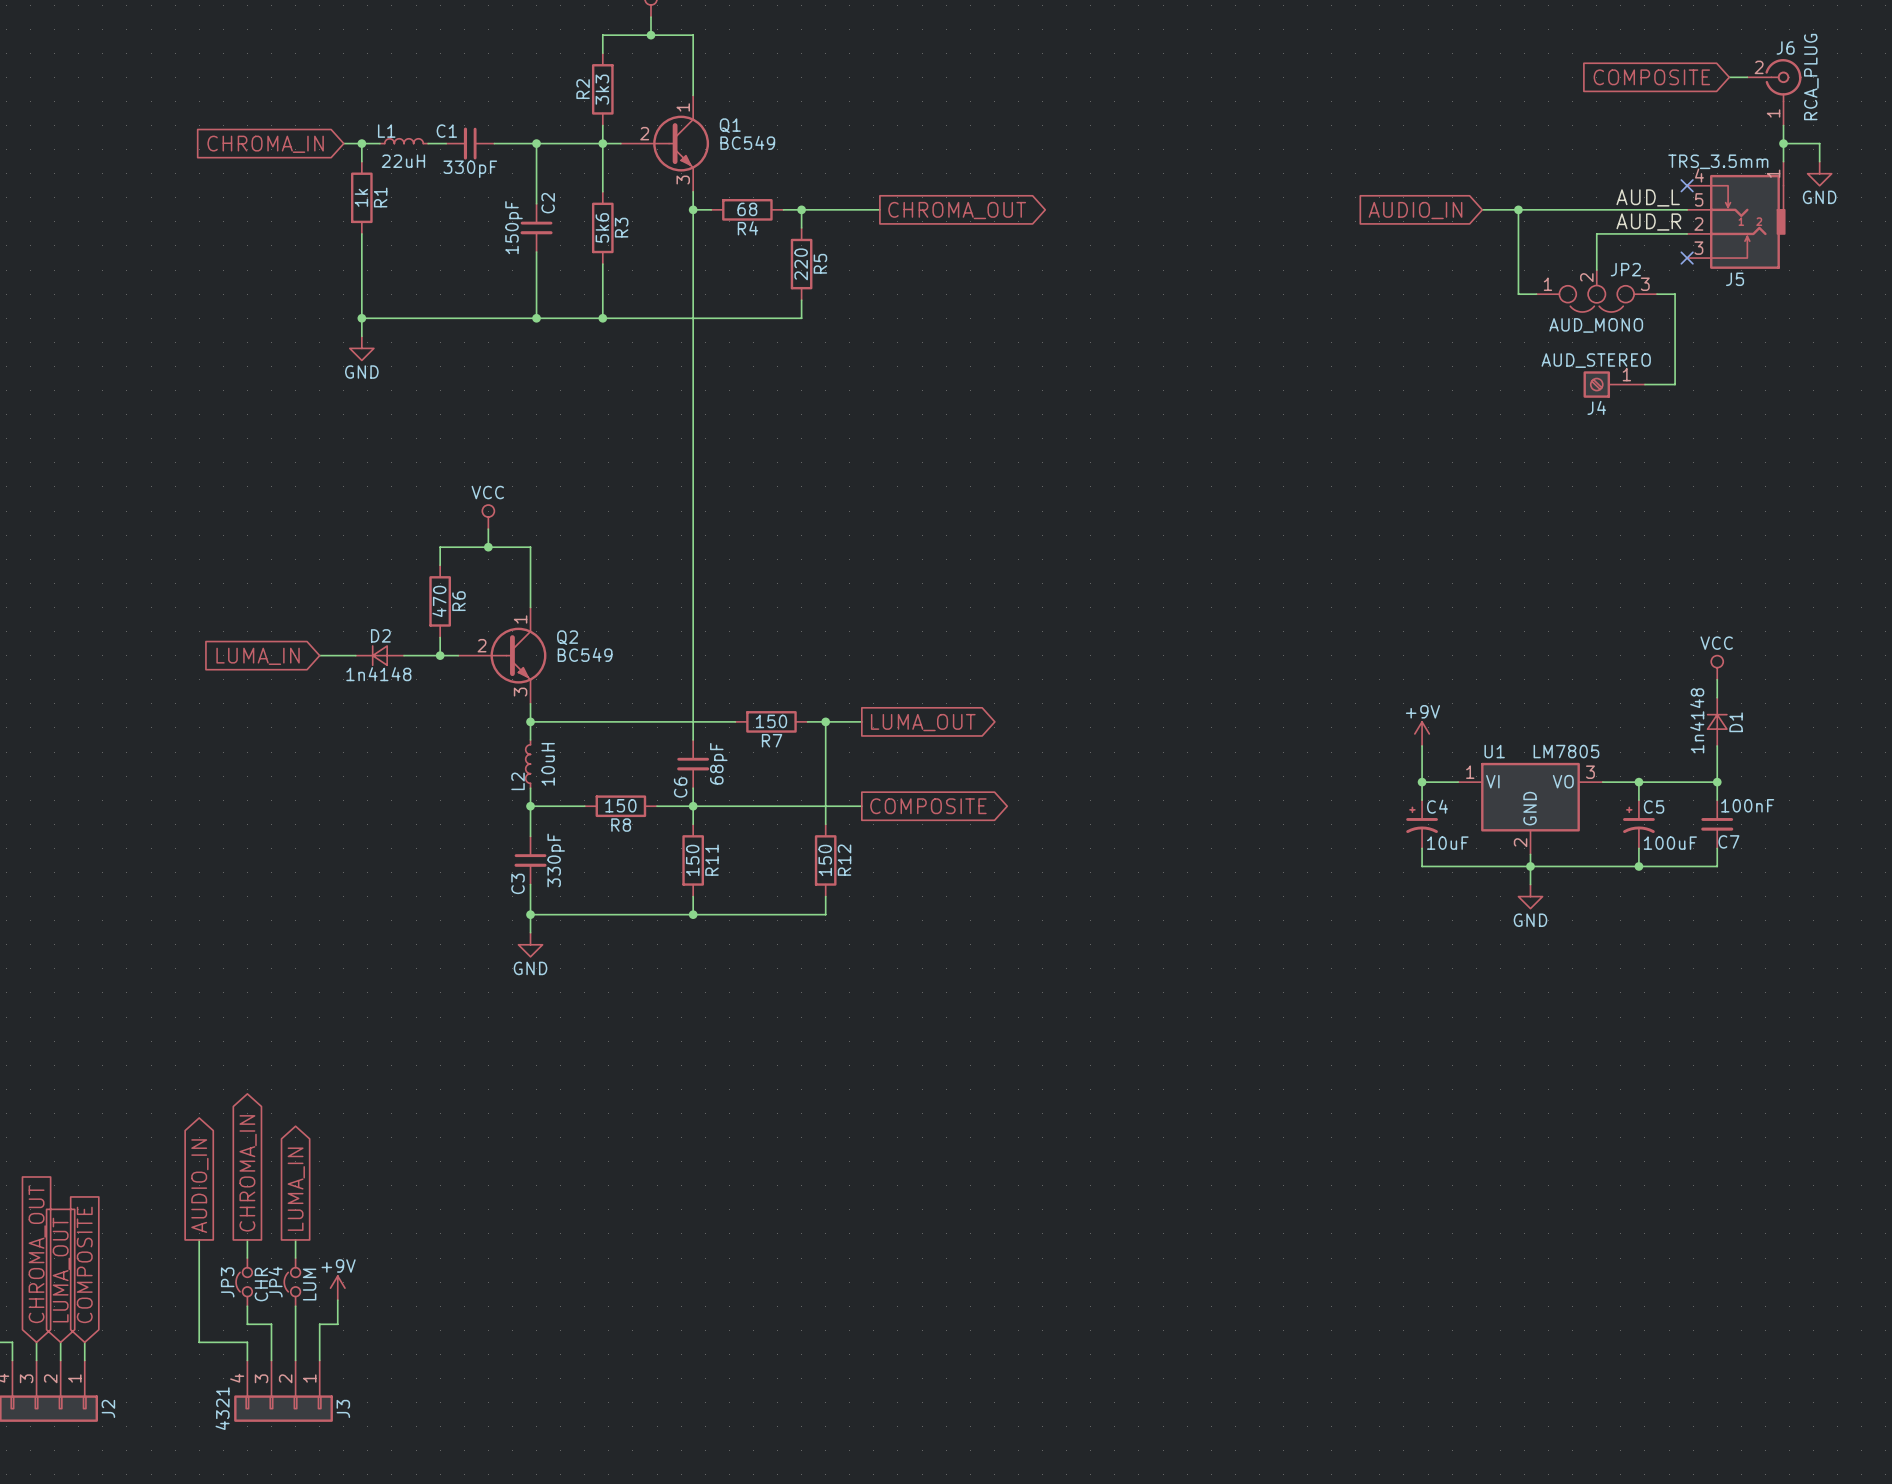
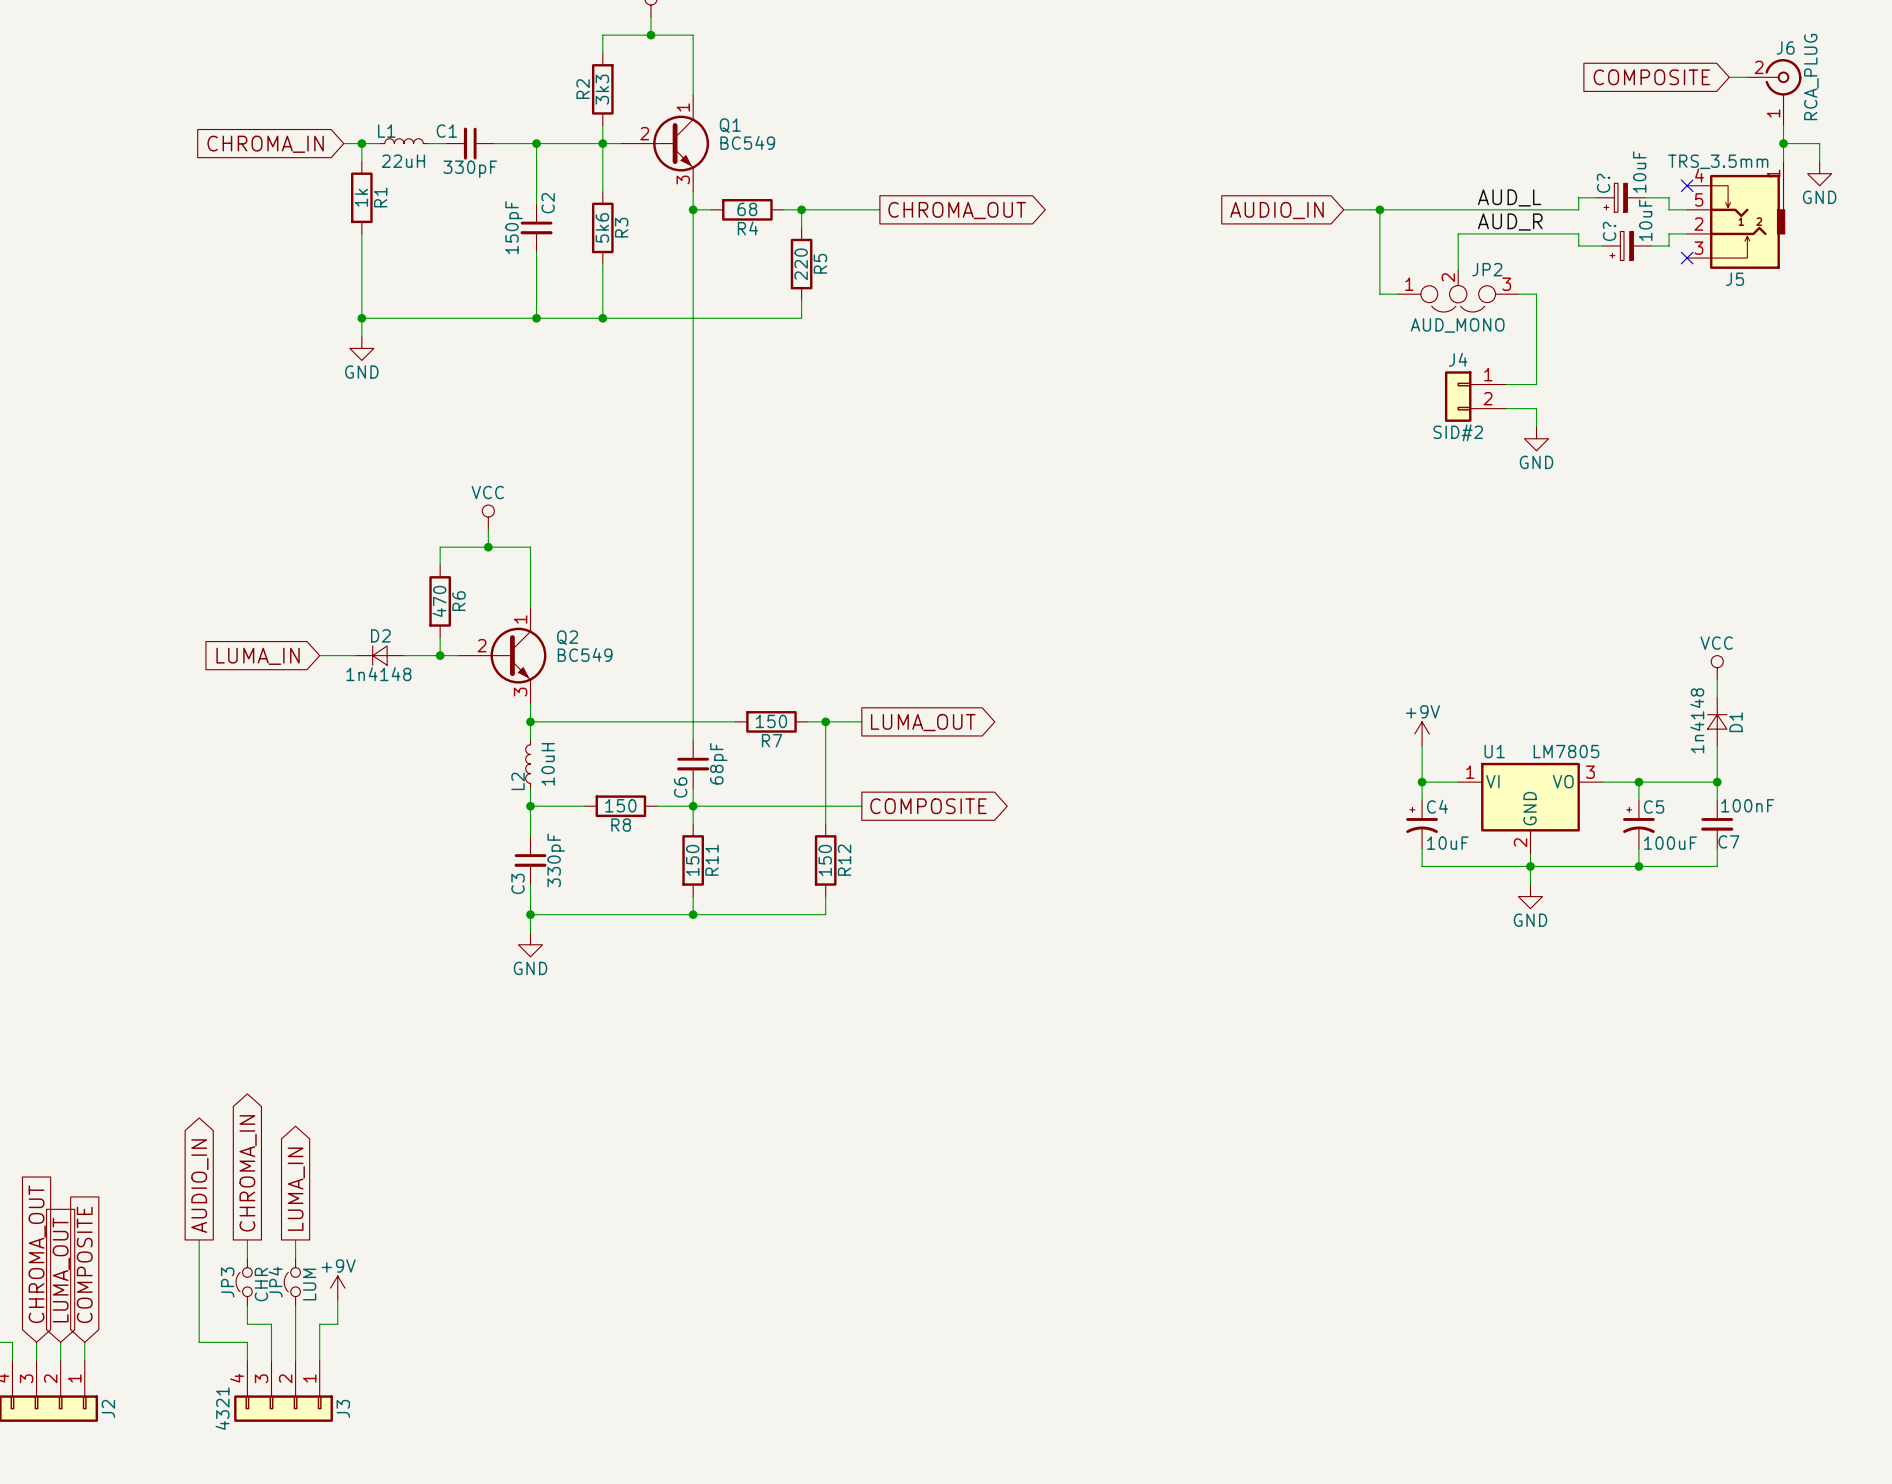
wire: none -> (1596, 197) (1578, 197) (1578, 209)
C?: none -> 10uF (1620, 197)
label position: AUD_L (1648, 197) -> AUD_L (1509, 197)
wire: none -> (1343, 209) (1482, 209)
wire: none -> (1379, 209) (1379, 294) (1397, 294)
junction: none -> (1379, 209)
wire: (1518, 209) (1518, 294) -> none
junction: (1518, 209) -> none
wire: (1578, 209) (1669, 209) -> (1644, 197) (1669, 197) (1669, 209)
global label position: AUDIO_IN (1415, 210) -> AUDIO_IN (1276, 210)
label position: AUD_R (1648, 222) -> AUD_R (1510, 222)
wire: (1669, 233) (1596, 233) (1596, 270) -> (1669, 233) (1669, 245) (1650, 245)
wire: none -> (1602, 245) (1578, 245) (1578, 233) (1458, 233) (1458, 270)
C?: none -> 10uF (1626, 245)
JP2 position: (1596, 291) -> (1458, 291)
wire: none -> (1536, 294) (1536, 384) (1506, 384)
wire: (1657, 294) (1675, 294) (1675, 384) (1644, 384) -> none
J4 value: AUD_STEREO (1596, 360) -> SID#2 (1458, 432)
J4 symbol: [1583, 371, 1645, 398] -> [1444, 371, 1507, 422]
J4 name position: J4 (1596, 407) -> J4 (1458, 359)
wire: none -> (1506, 408) (1536, 408) (1536, 426)
power symbol: none -> GND (1536, 438)

